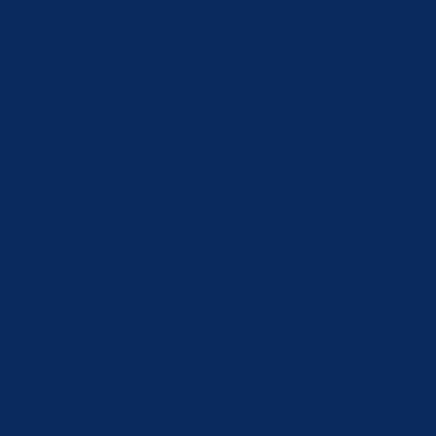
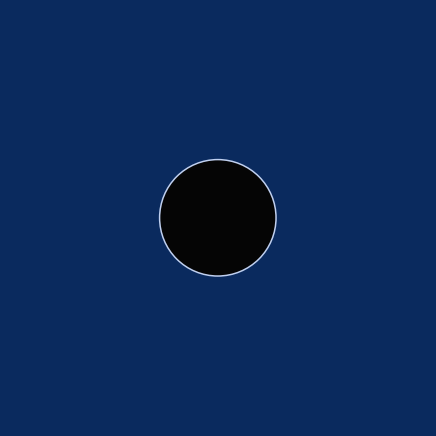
part: none -> (217, 217)

